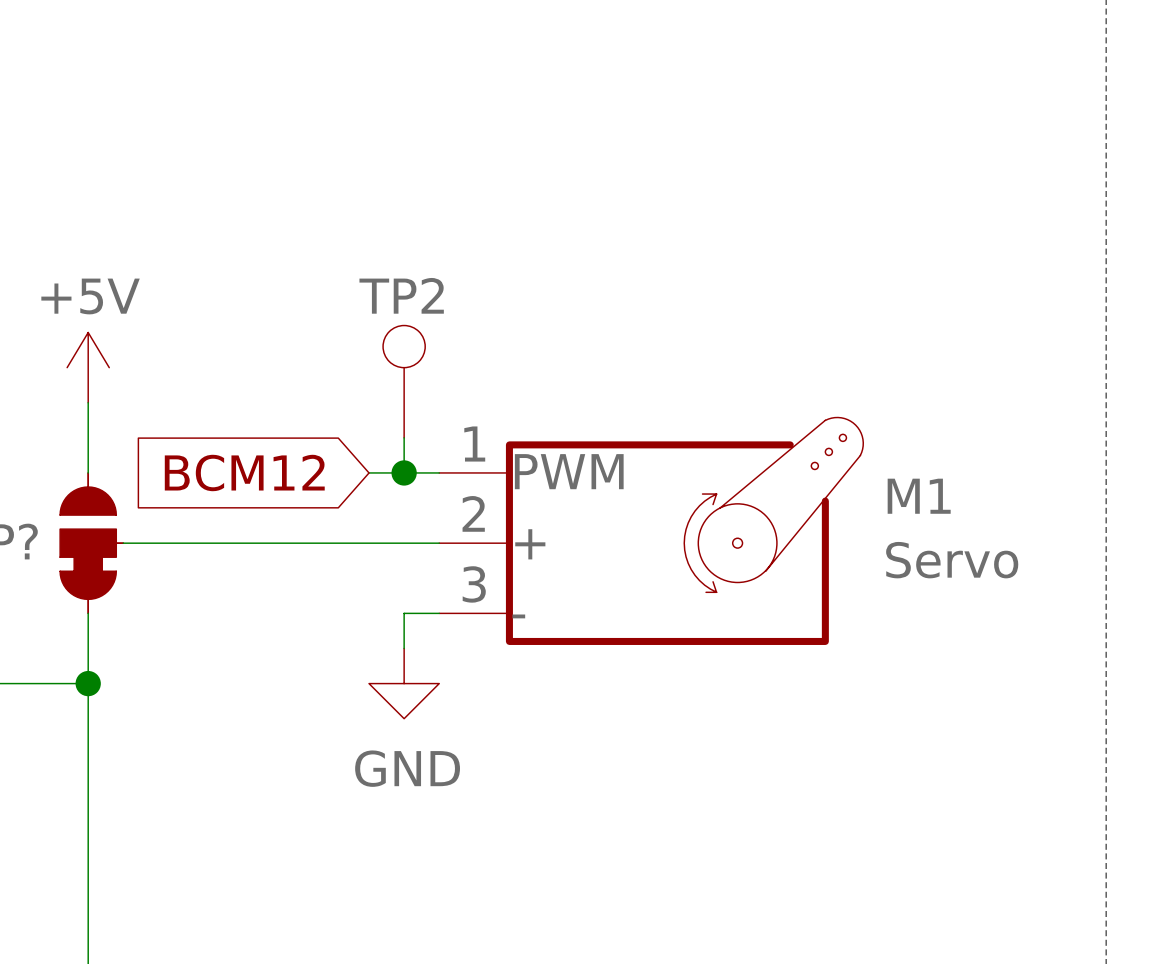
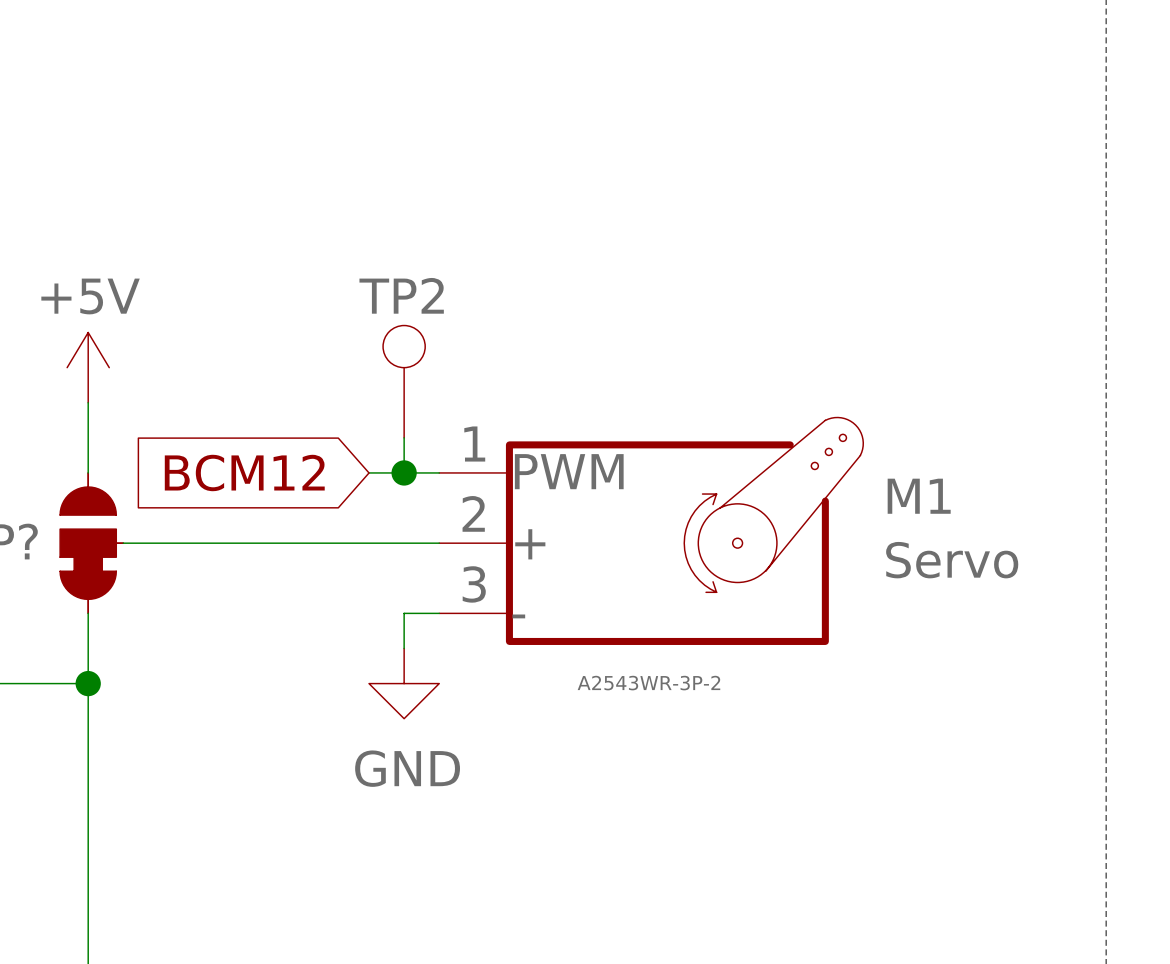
M1 text: none -> A2543WR-3P-2 (648, 683)

